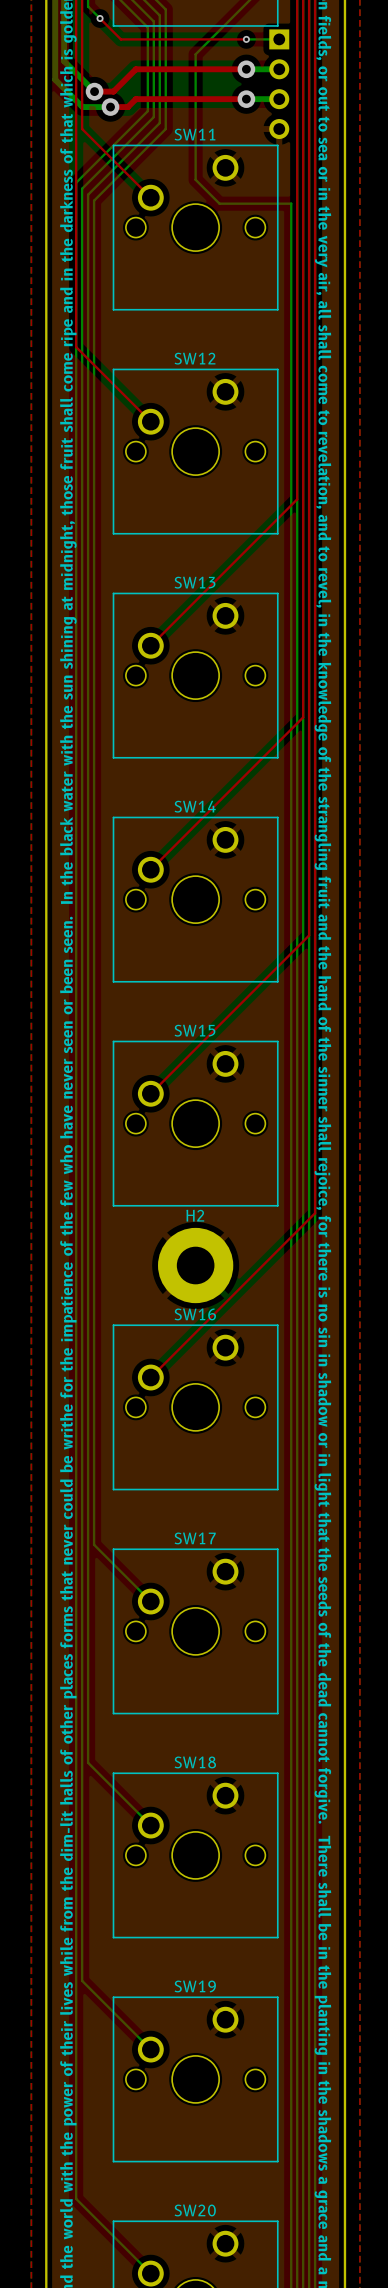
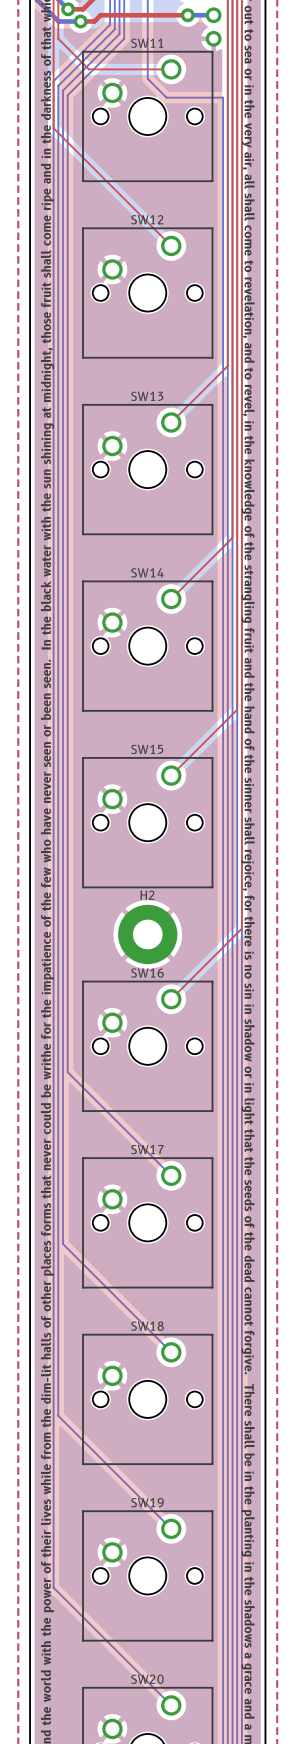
top track: (120, 167) (150, 197) -> (88, 69) (171, 69)
top track: (76, 242) (76, 347) (150, 421) -> (53, 128) (171, 245)
top track: (297, 499) (150, 645) -> (227, 330) (227, 365) (171, 422)
top track: (303, 717) (150, 869) -> (232, 502) (232, 537) (171, 599)
top track: (309, 935) (150, 1093) -> (237, 674) (237, 709) (171, 775)
top track: (315, 1213) (150, 1377) -> (241, 893) (241, 928) (171, 999)
bottom track: (94, 1440) (94, 1544) (150, 1601) -> (67, 1072) (171, 1175)
bottom track: (88, 1658) (88, 1762) (150, 1825) -> (63, 1244) (171, 1352)
bottom track: (82, 1876) (82, 1980) (150, 2049) -> (58, 1415) (171, 1528)
bottom track: (76, 2094) (76, 2198) (150, 2273) -> (53, 1587) (171, 1705)

